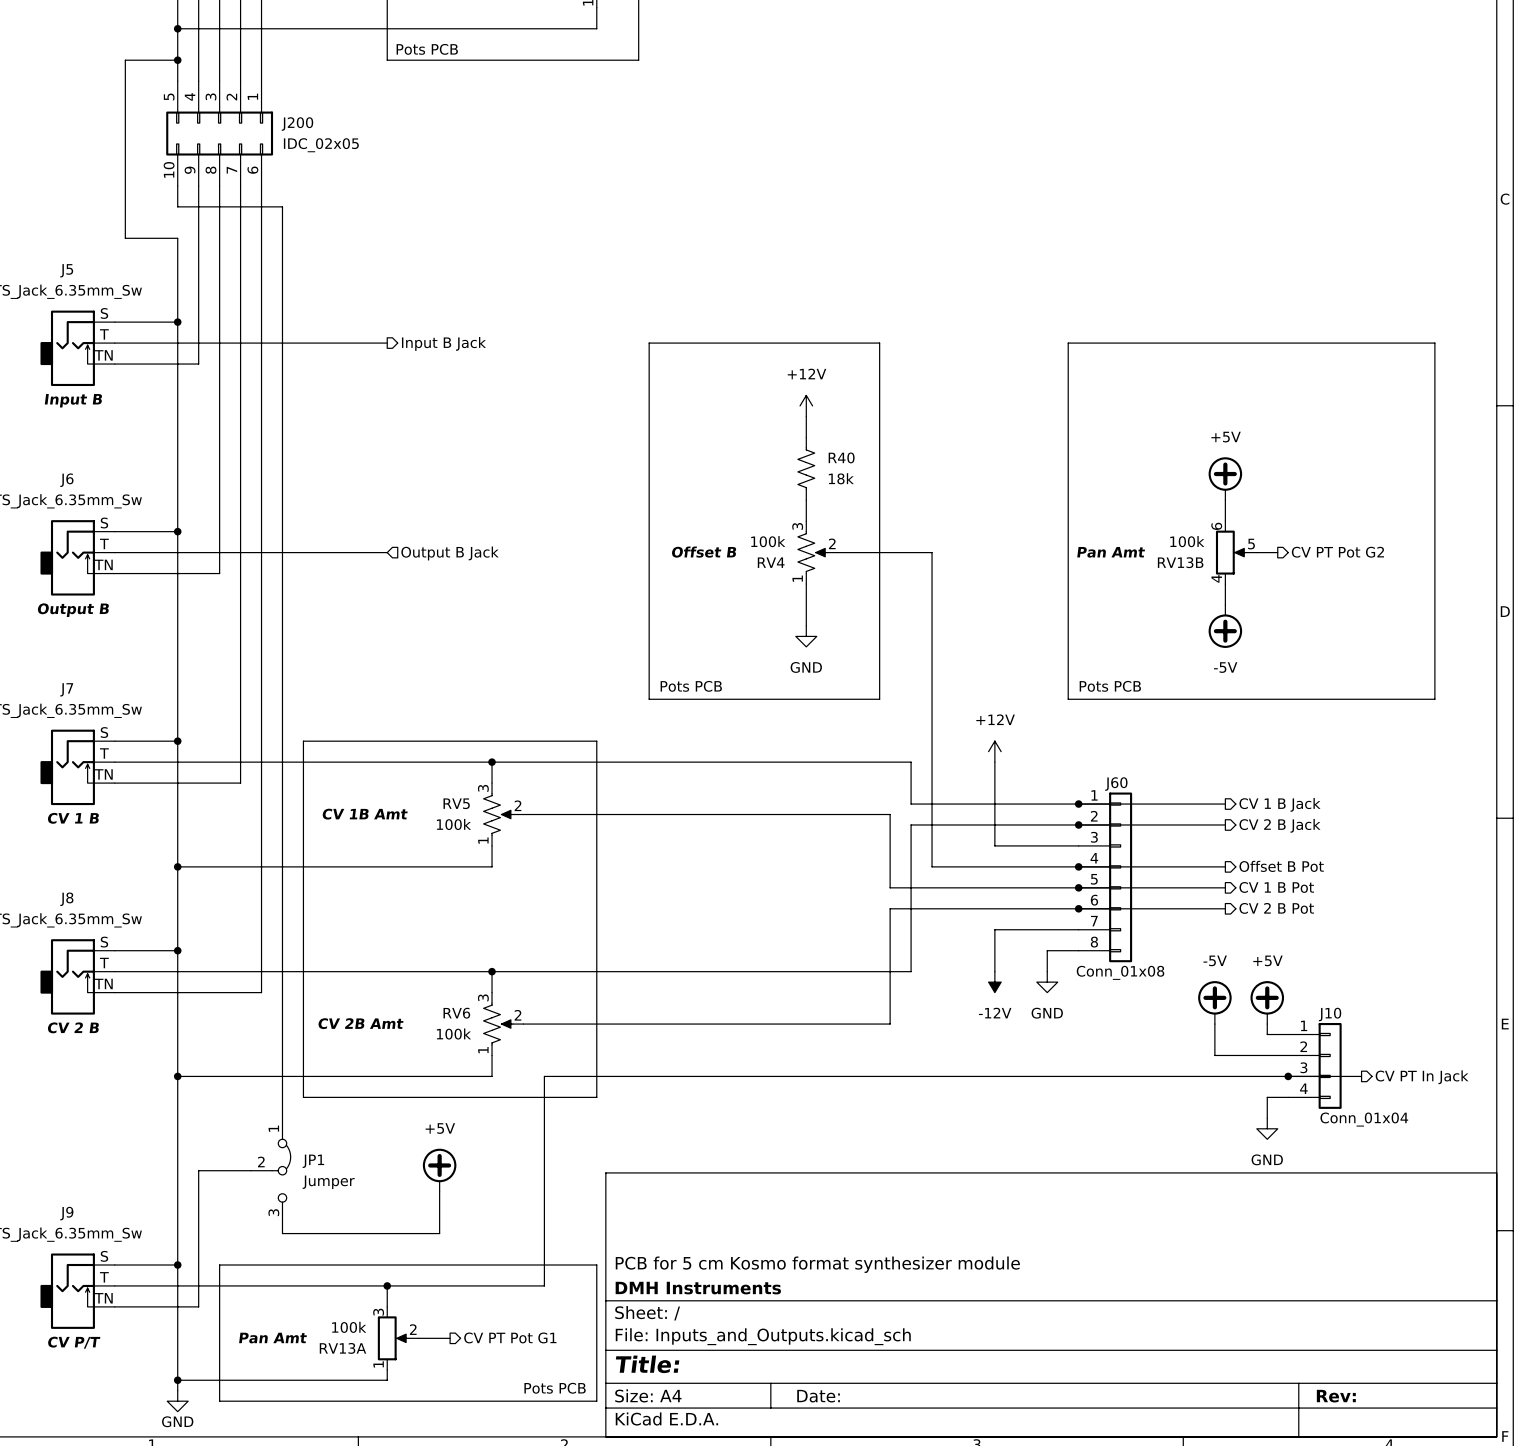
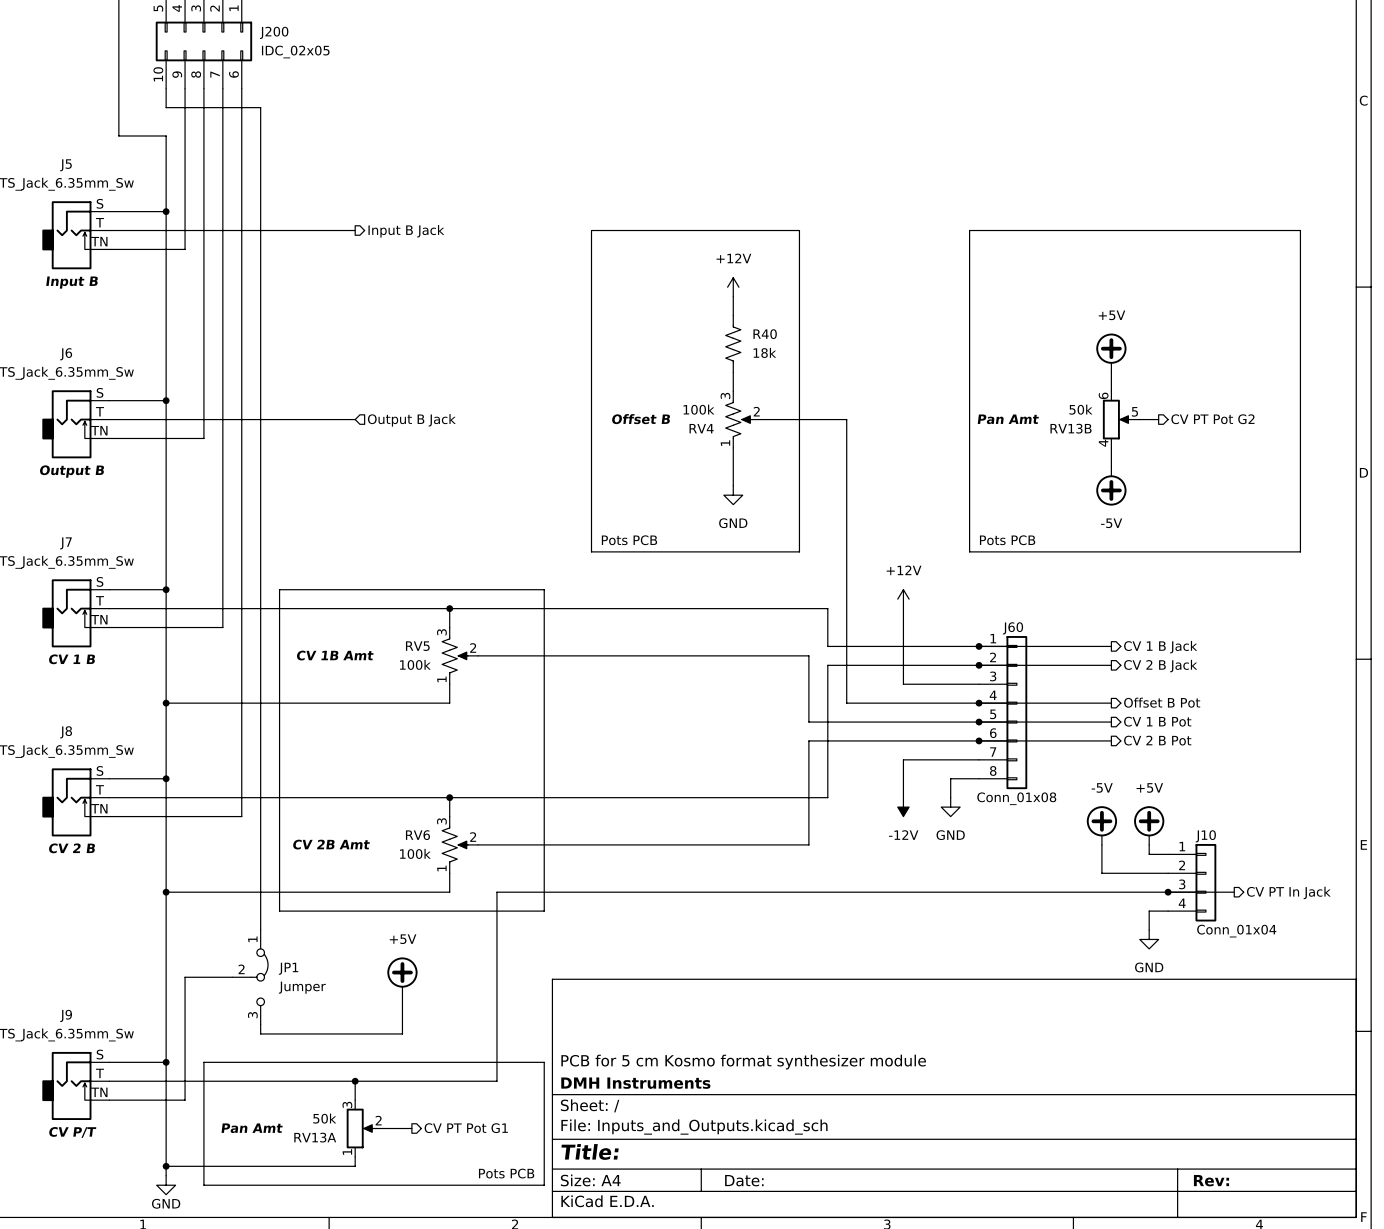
RV13B value: 100k (1187, 541) -> 50k (1080, 409)
RV13A value: 100k (349, 1327) -> 50k (324, 1118)

